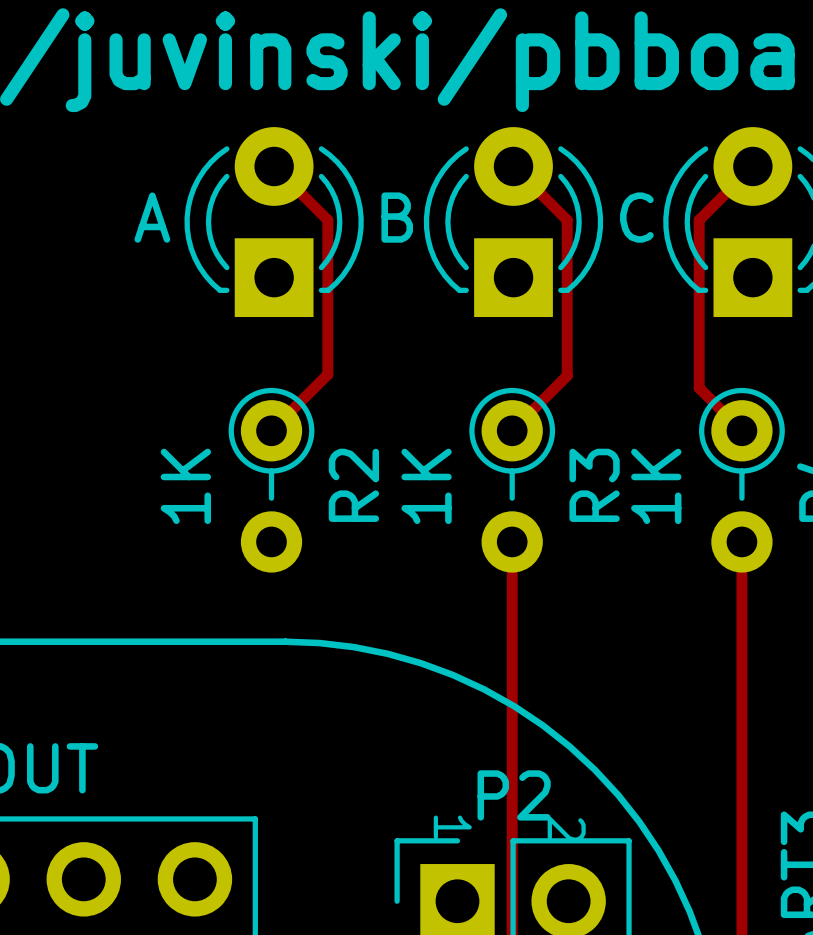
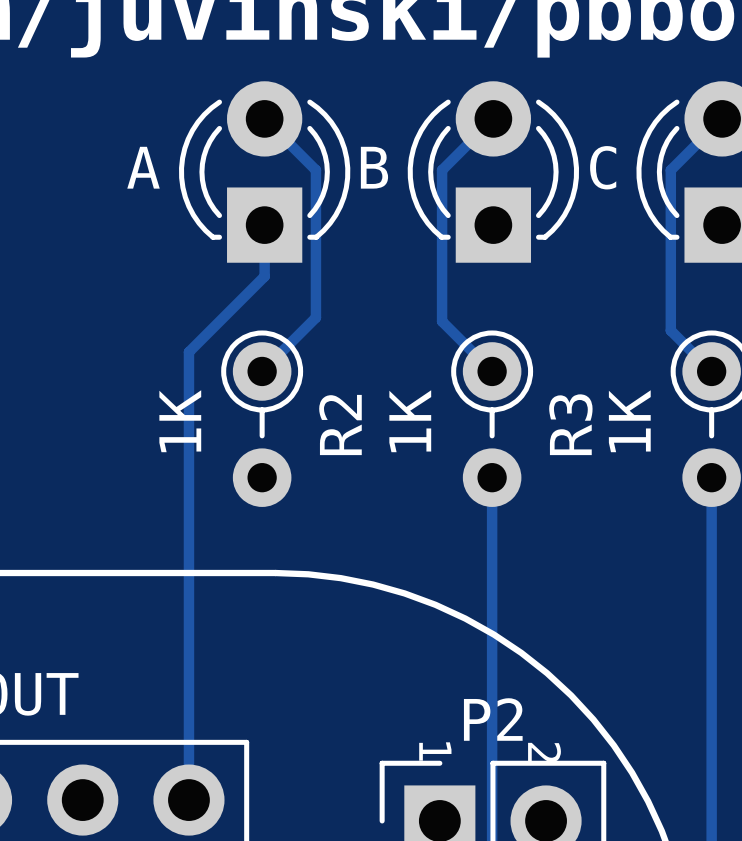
track: (513, 166) (567, 220) (567, 375) (512, 430) -> (493, 118) (442, 170) (442, 321) (492, 371)
track: none -> (264, 225) (264, 276) (188, 352) (188, 800)

